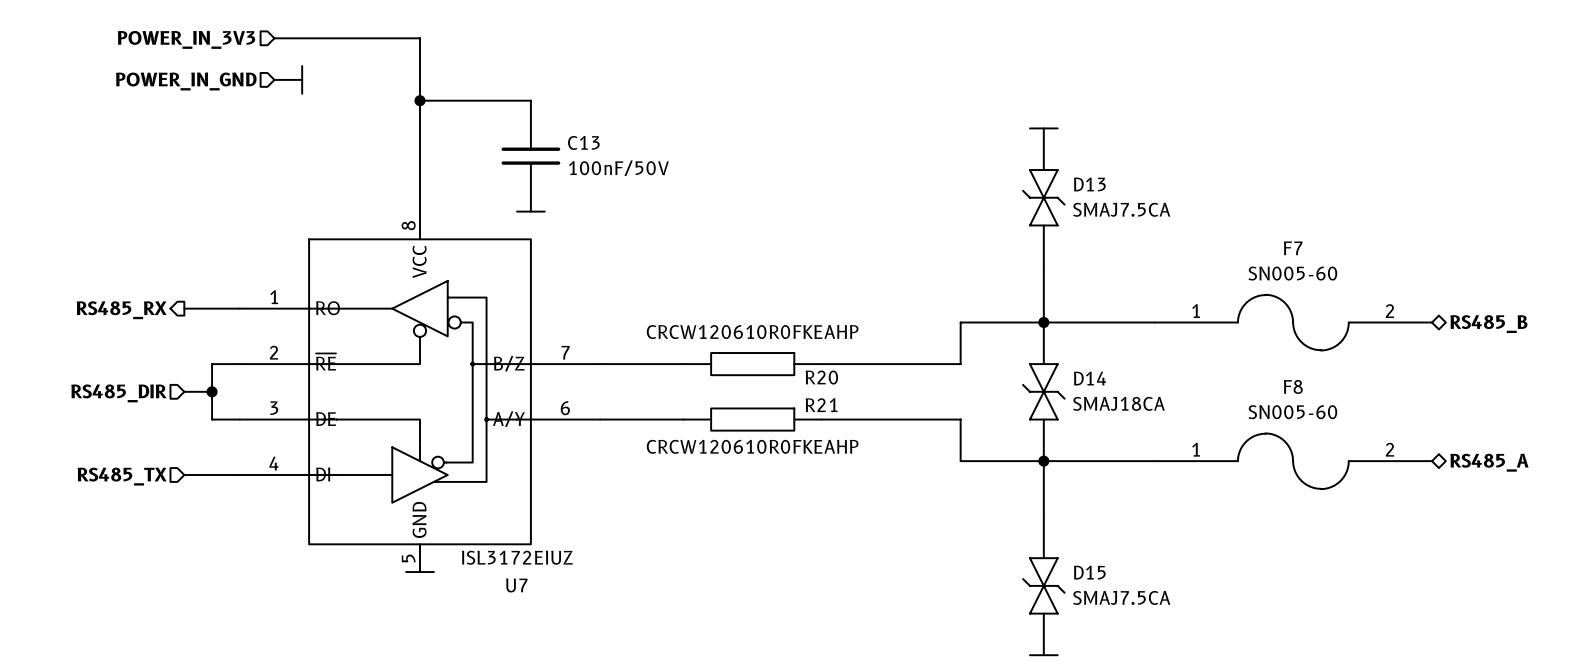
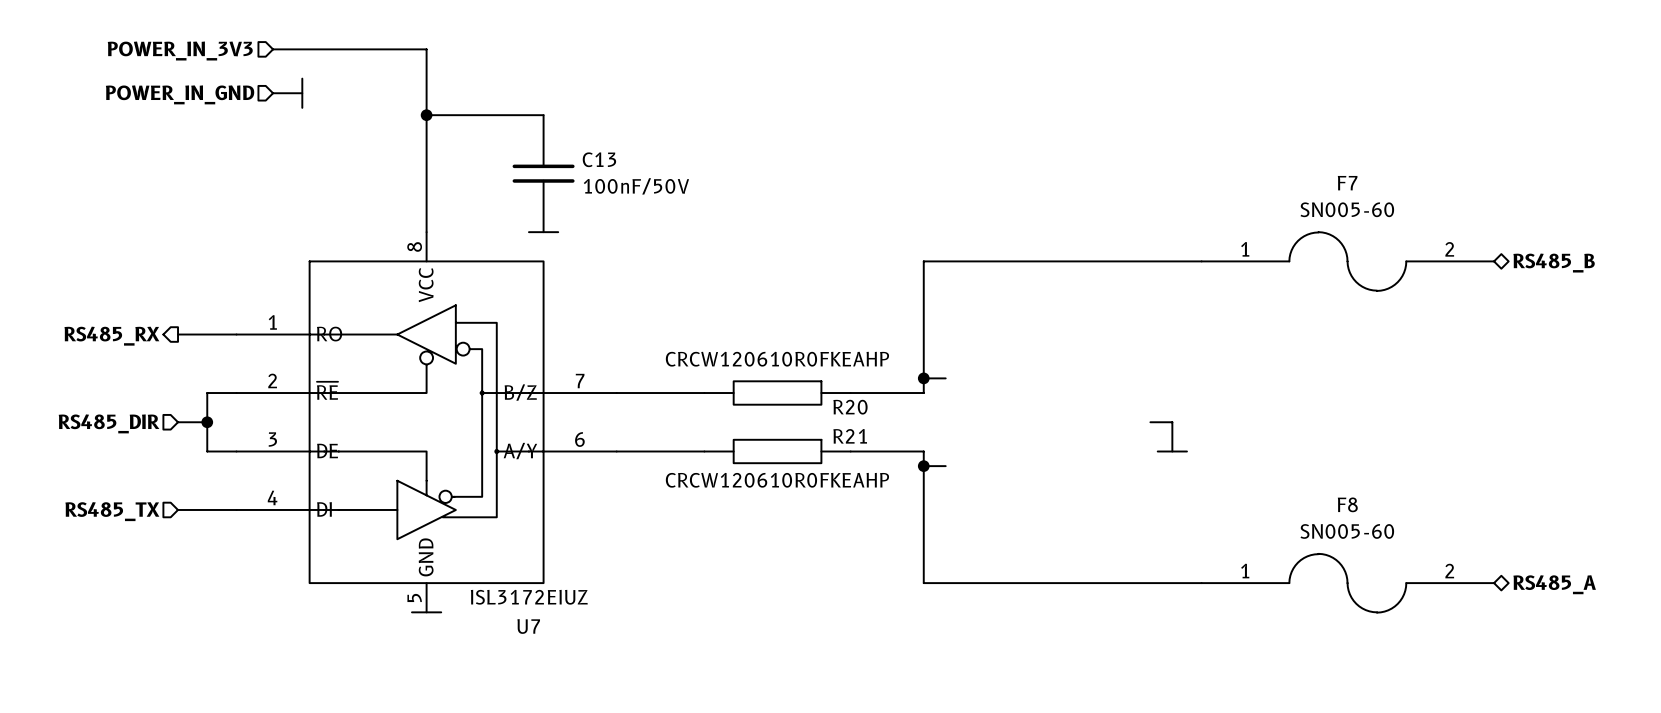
power symbol: (1043, 128) -> none
D13: SMAJ7.5CA (1043, 197) -> none
wire: (1043, 267) (1043, 322) -> none
junction: (1043, 322) -> none
wire: (1154, 322) (960, 322) (960, 364) (891, 364) -> (1201, 261) (923, 261) (923, 393)
F7 position: (1293, 322) -> (1347, 261)
hierarchical label position: RS485_B (1488, 324) -> RS485_B (1554, 263)
wire: none -> (923, 378) (945, 378)
junction: none -> (923, 378)
D14: SMAJ18CA (1043, 391) -> none
wire: none -> (1150, 422) (1172, 422) (1172, 451)
wire: (891, 419) (960, 419) (960, 461) (1154, 461) -> (923, 451) (923, 583) (1201, 583)
power symbol: none -> (1172, 451)
wire: none -> (923, 466) (945, 466)
junction: none -> (923, 466)
wire: (1043, 461) (1043, 516) -> none
junction: (1043, 461) -> none
F8 position: (1293, 461) -> (1347, 583)
hierarchical label position: RS485_A (1489, 462) -> RS485_A (1554, 584)
D15: SMAJ7.5CA (1043, 585) -> none
power symbol: (1043, 655) -> none

